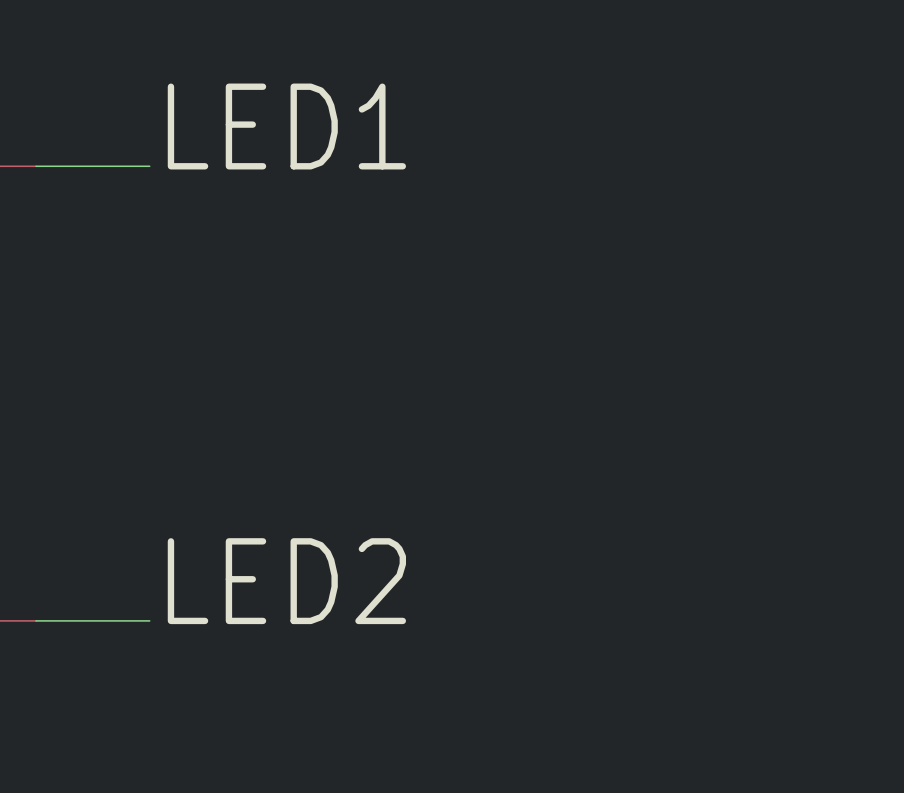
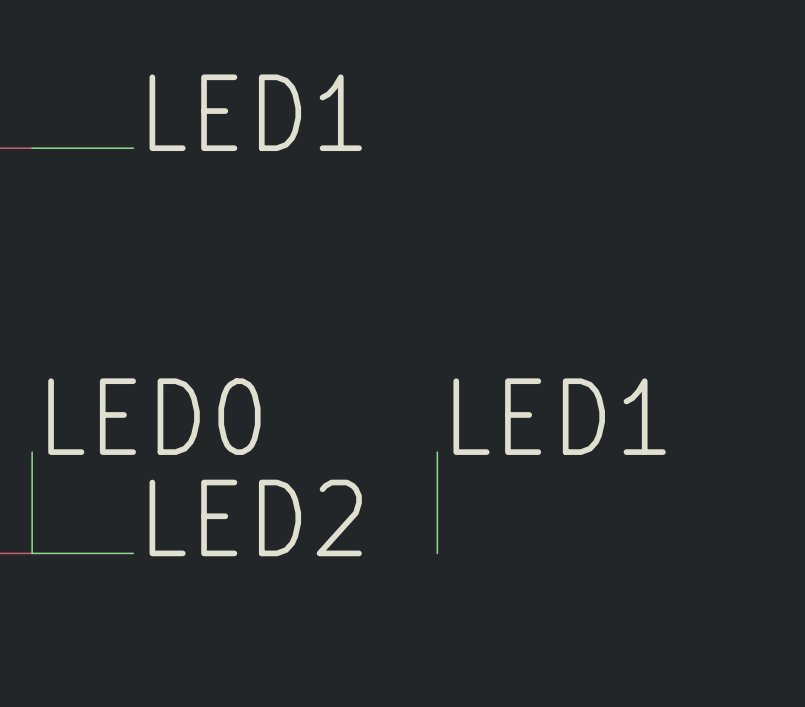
label: none -> LED0 (154, 416)
label: none -> LED1 (559, 416)
wire: none -> (32, 452) (32, 553)
wire: none -> (437, 452) (437, 553)

